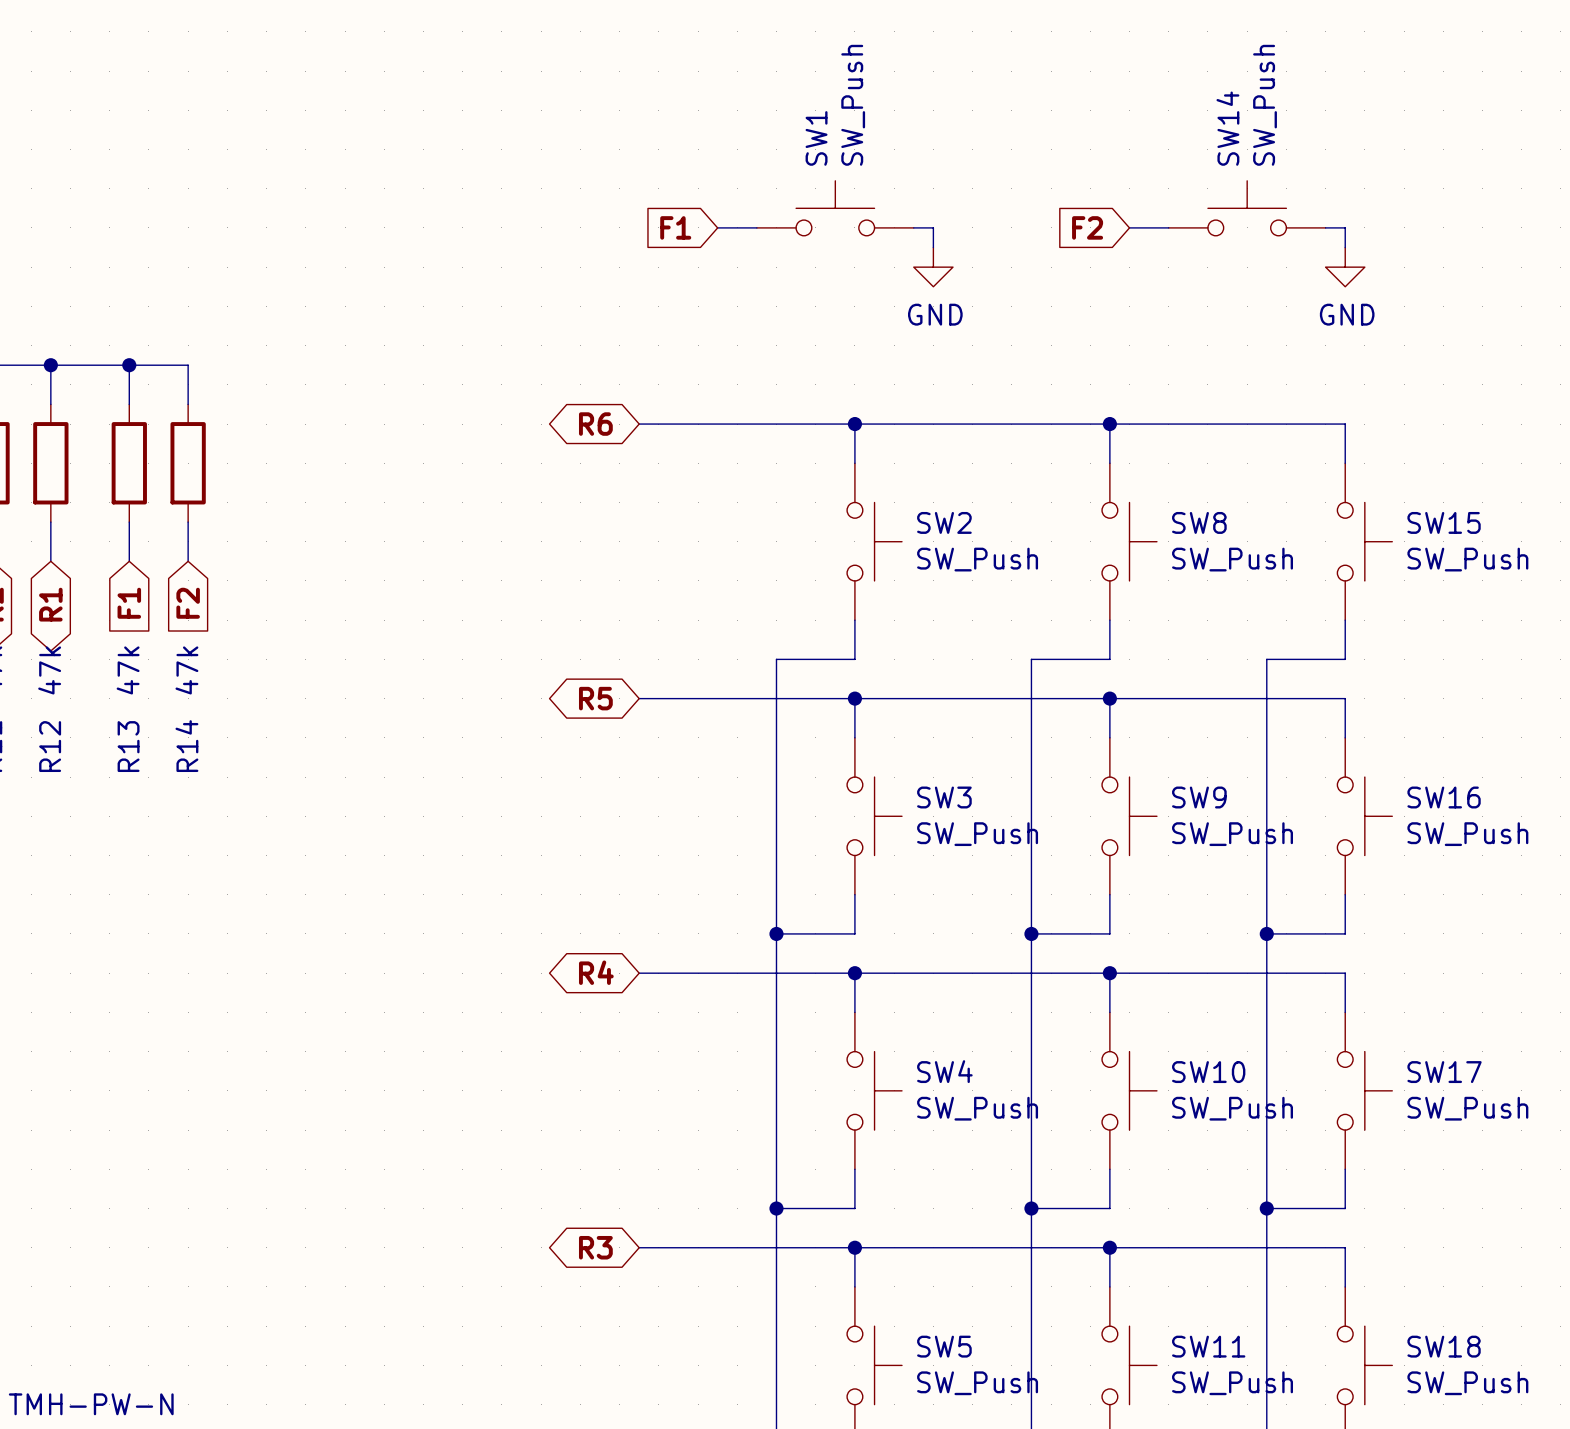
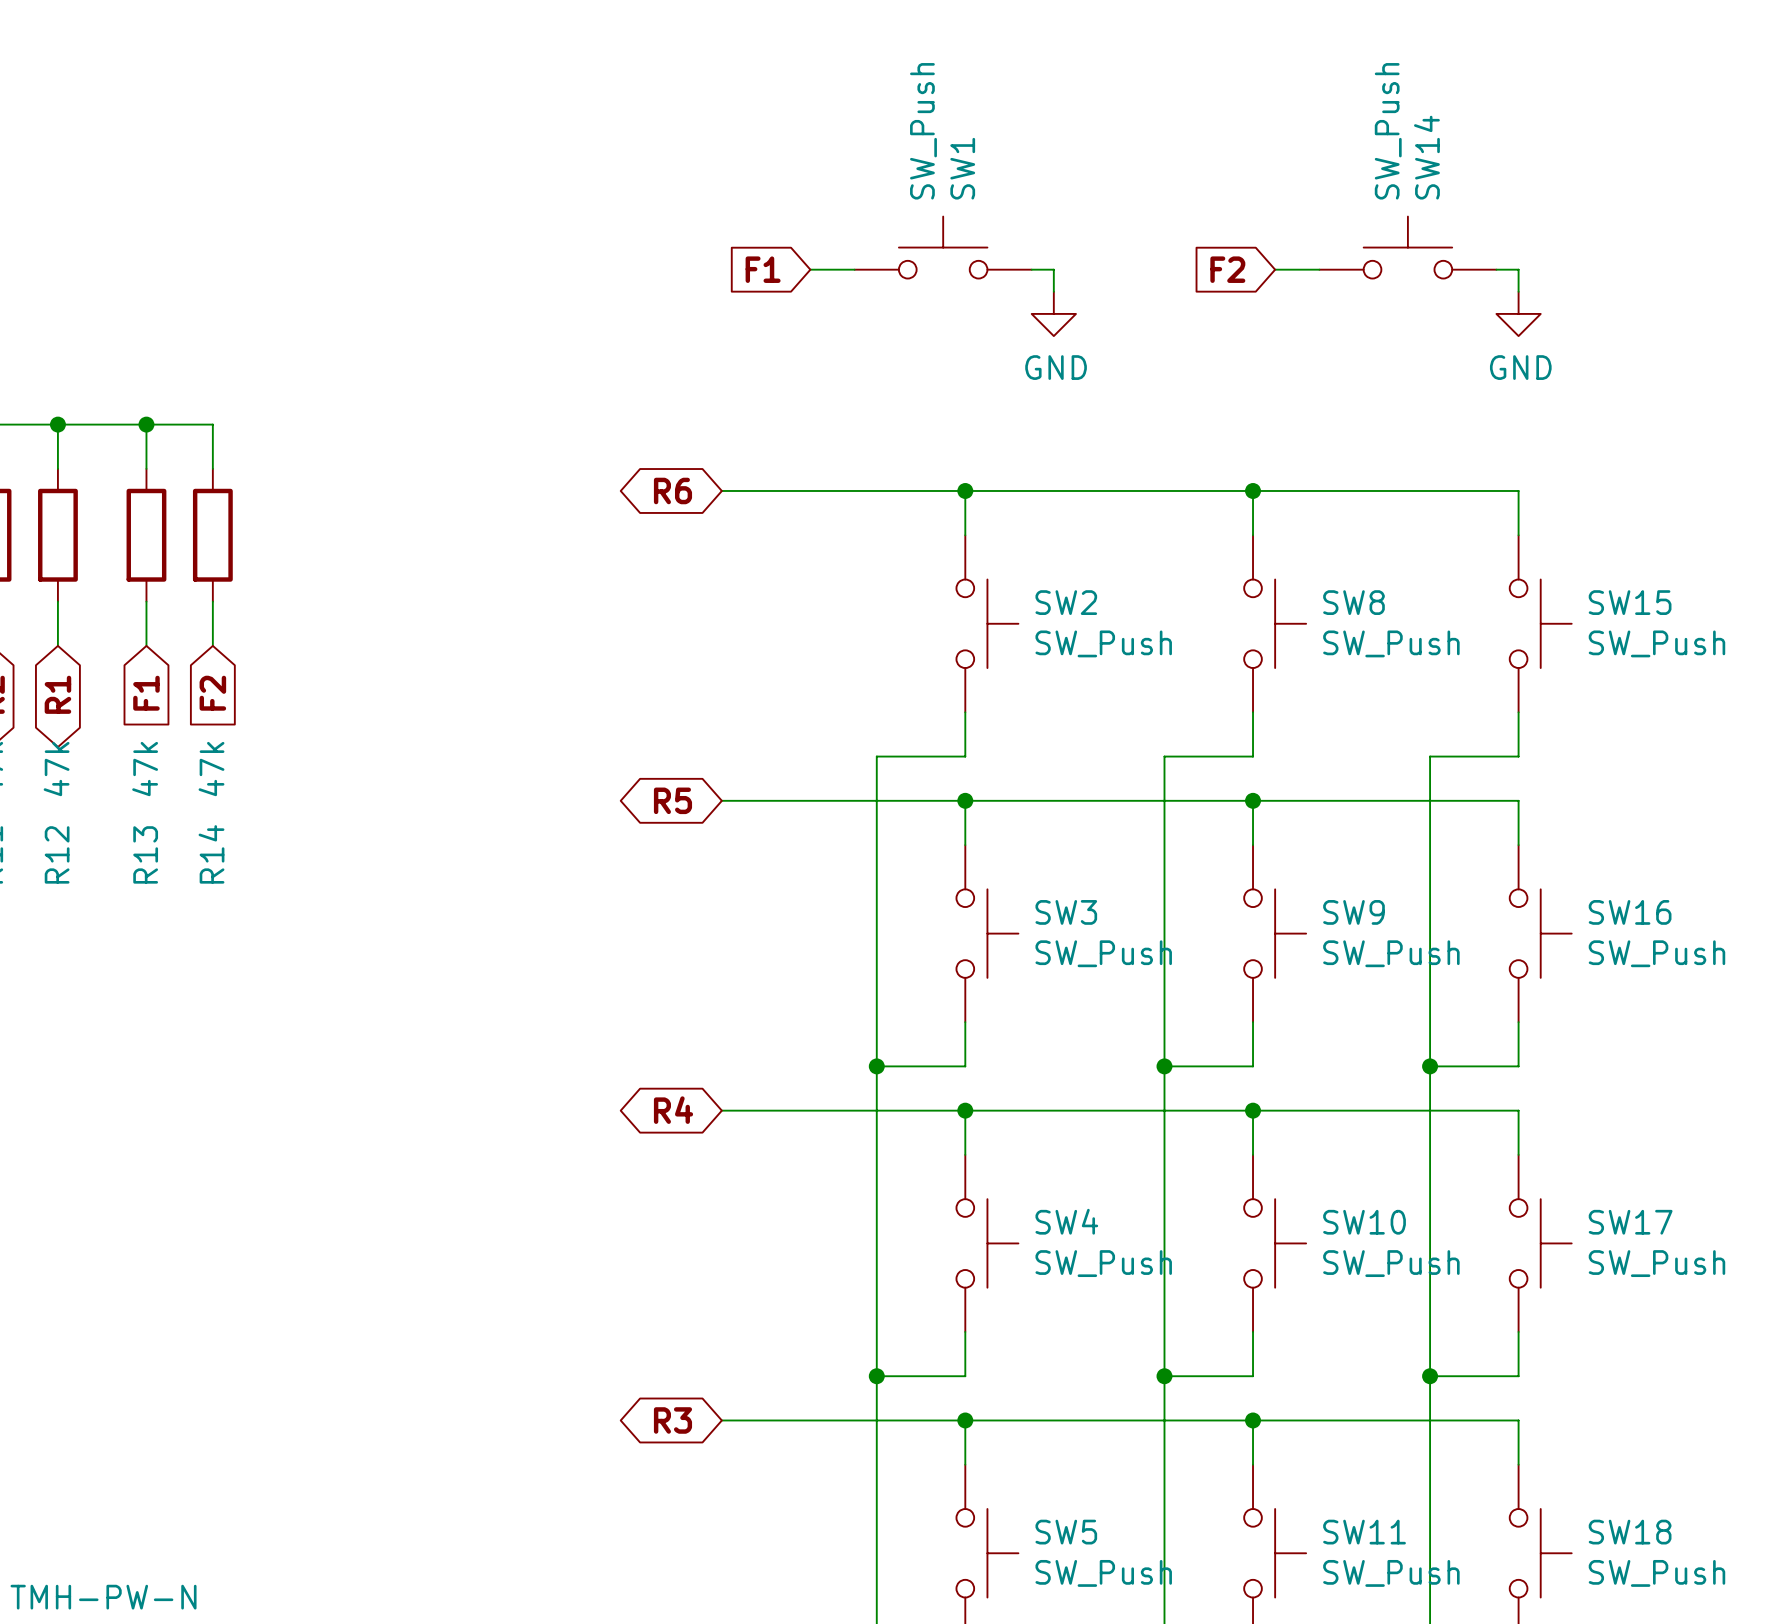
SW1 value position: SW_Push (853, 105) -> SW_Push (923, 131)
SW14 value position: SW_Push (1265, 105) -> SW_Push (1388, 131)
SW14 name position: SW14 (1227, 128) -> SW14 (1426, 157)
SW1 name position: SW1 (816, 138) -> SW1 (962, 168)

